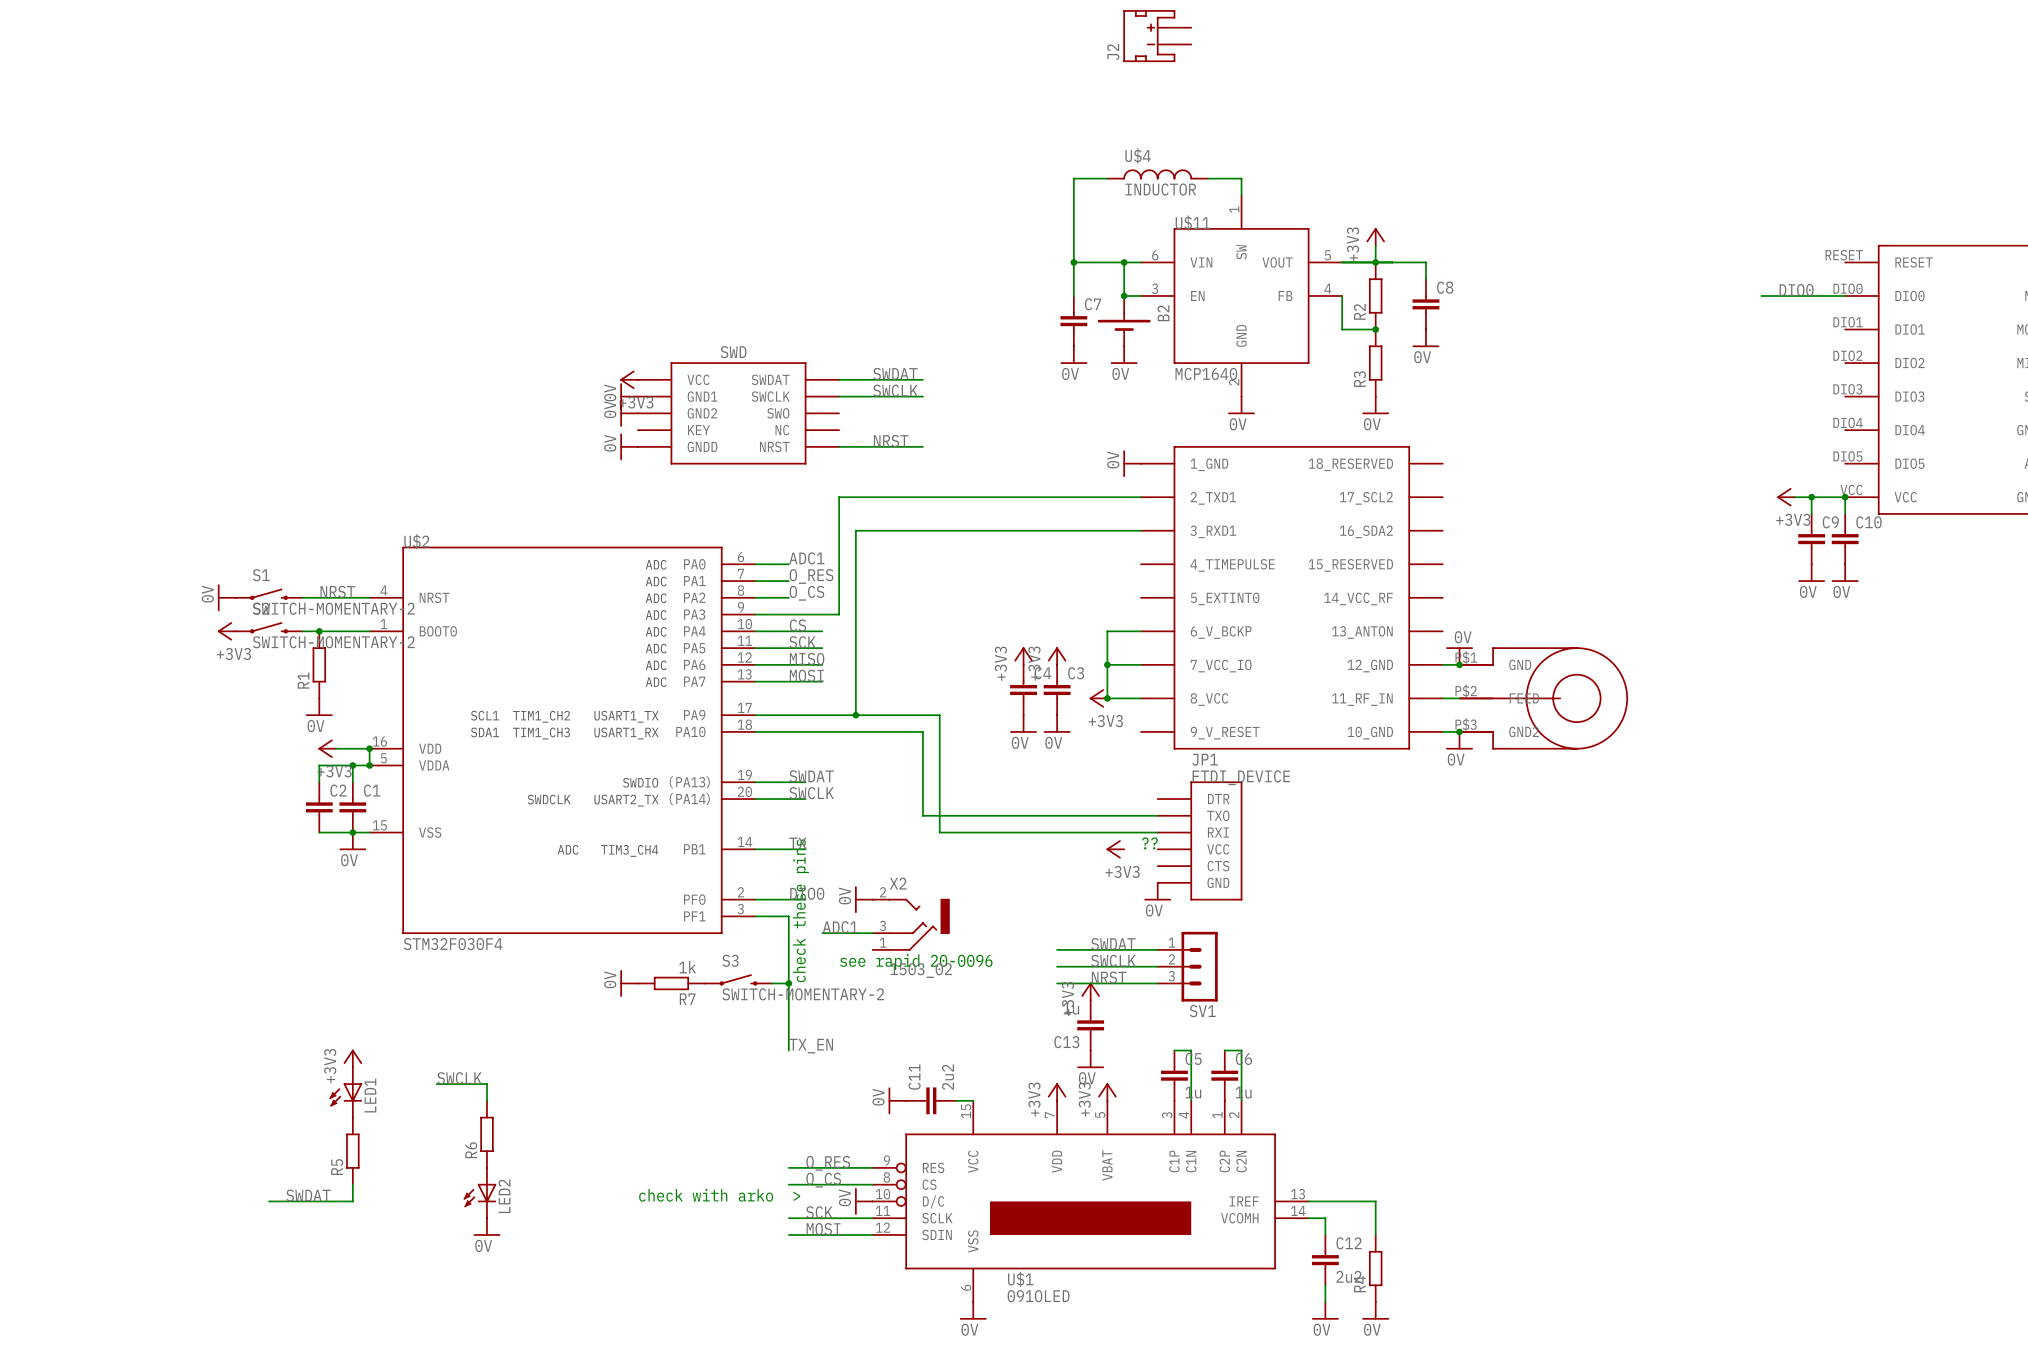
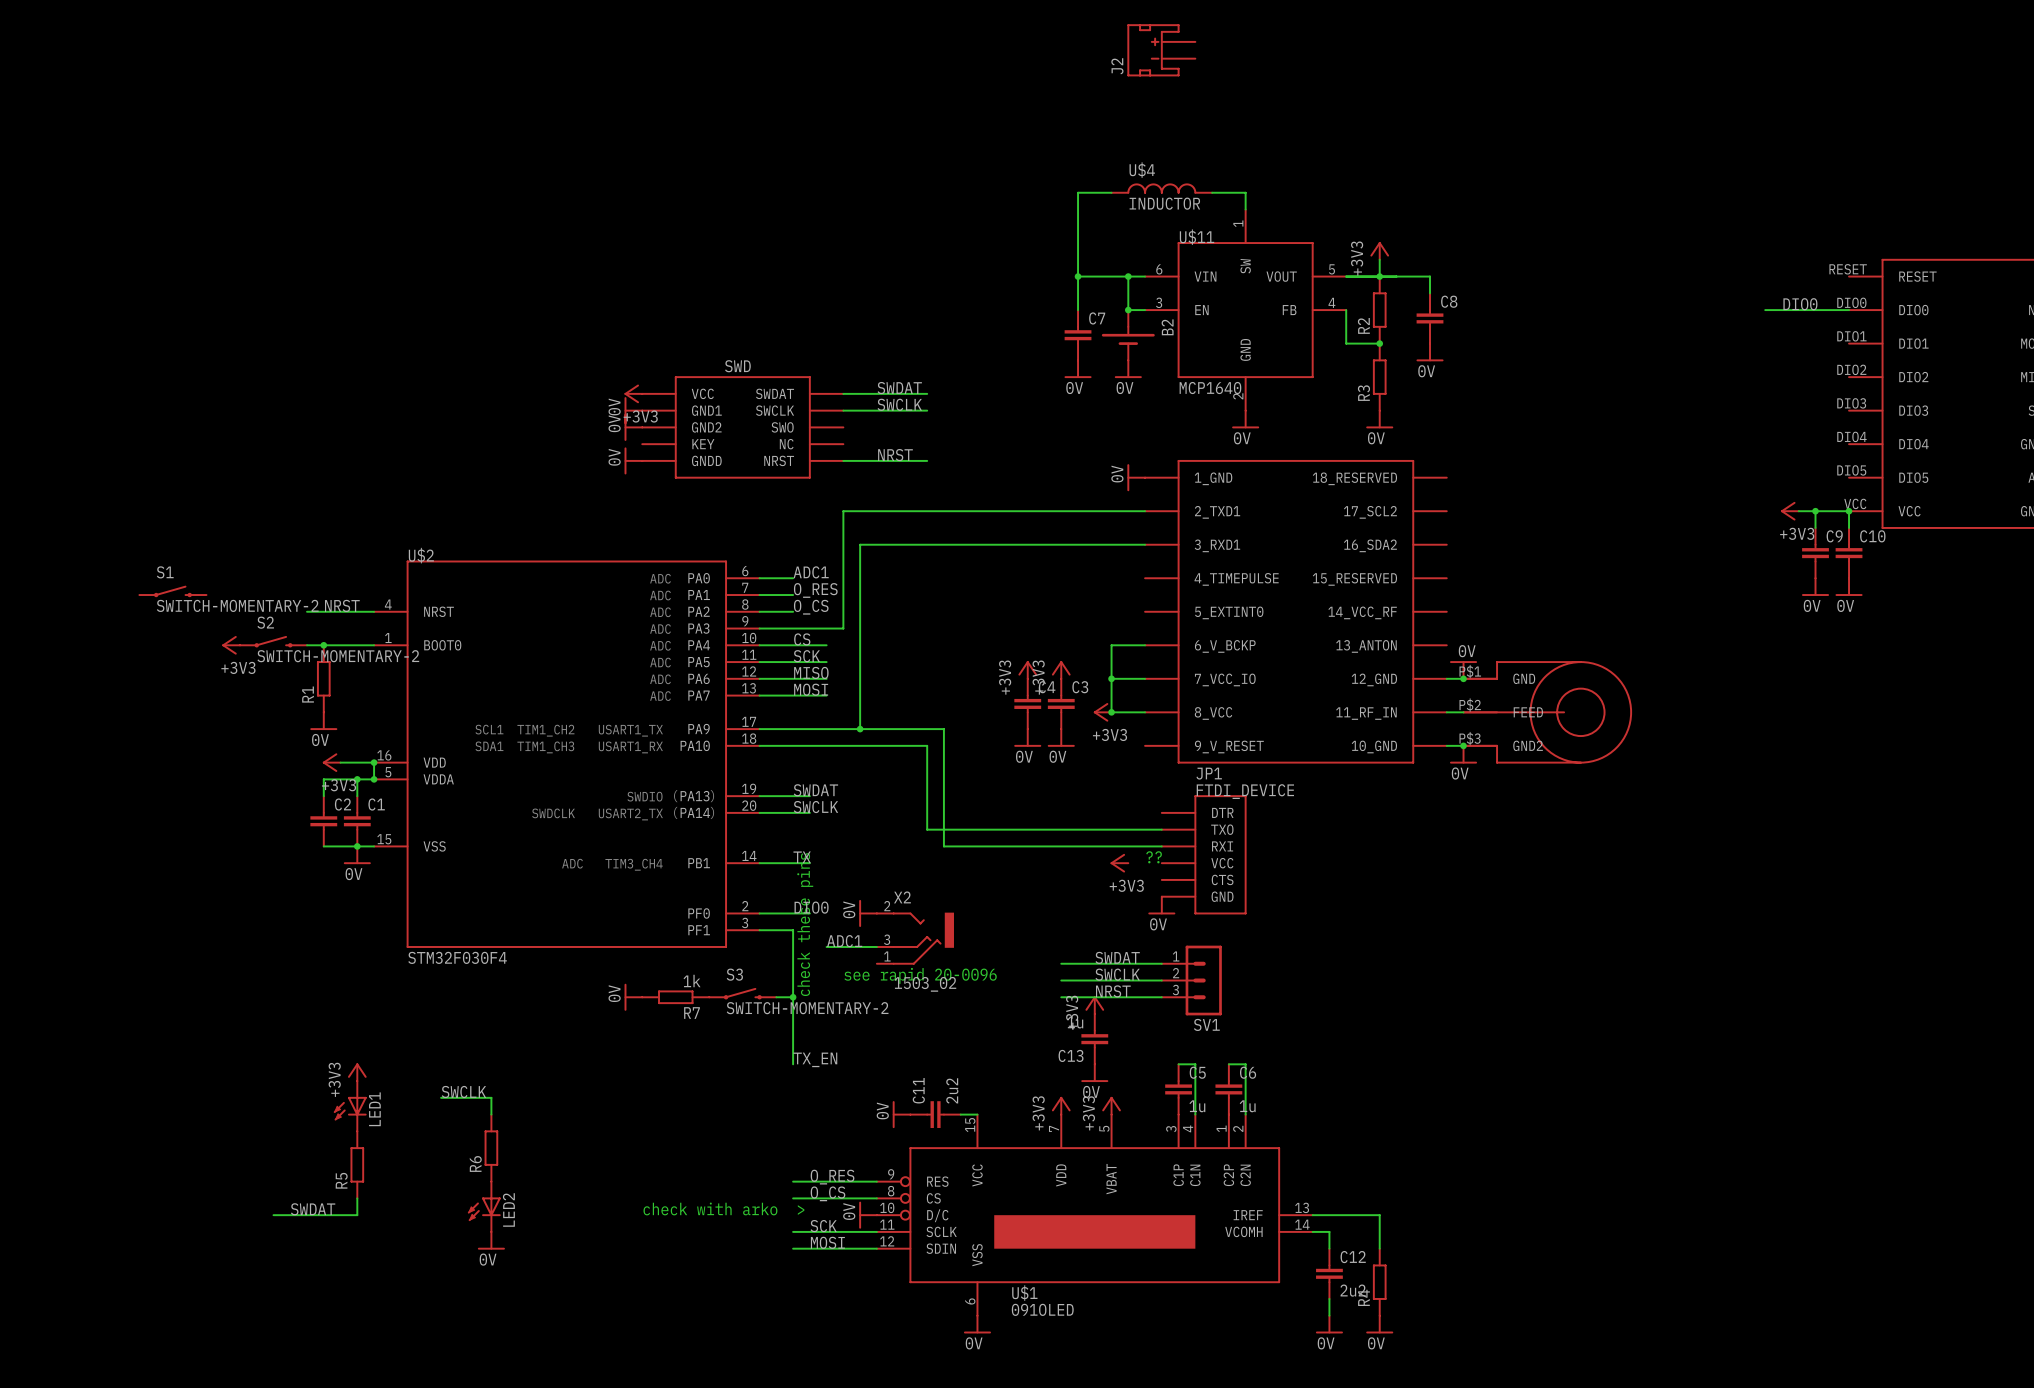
S1 position: (269, 594) -> (172, 591)
power symbol: 0V (226, 597) -> none

